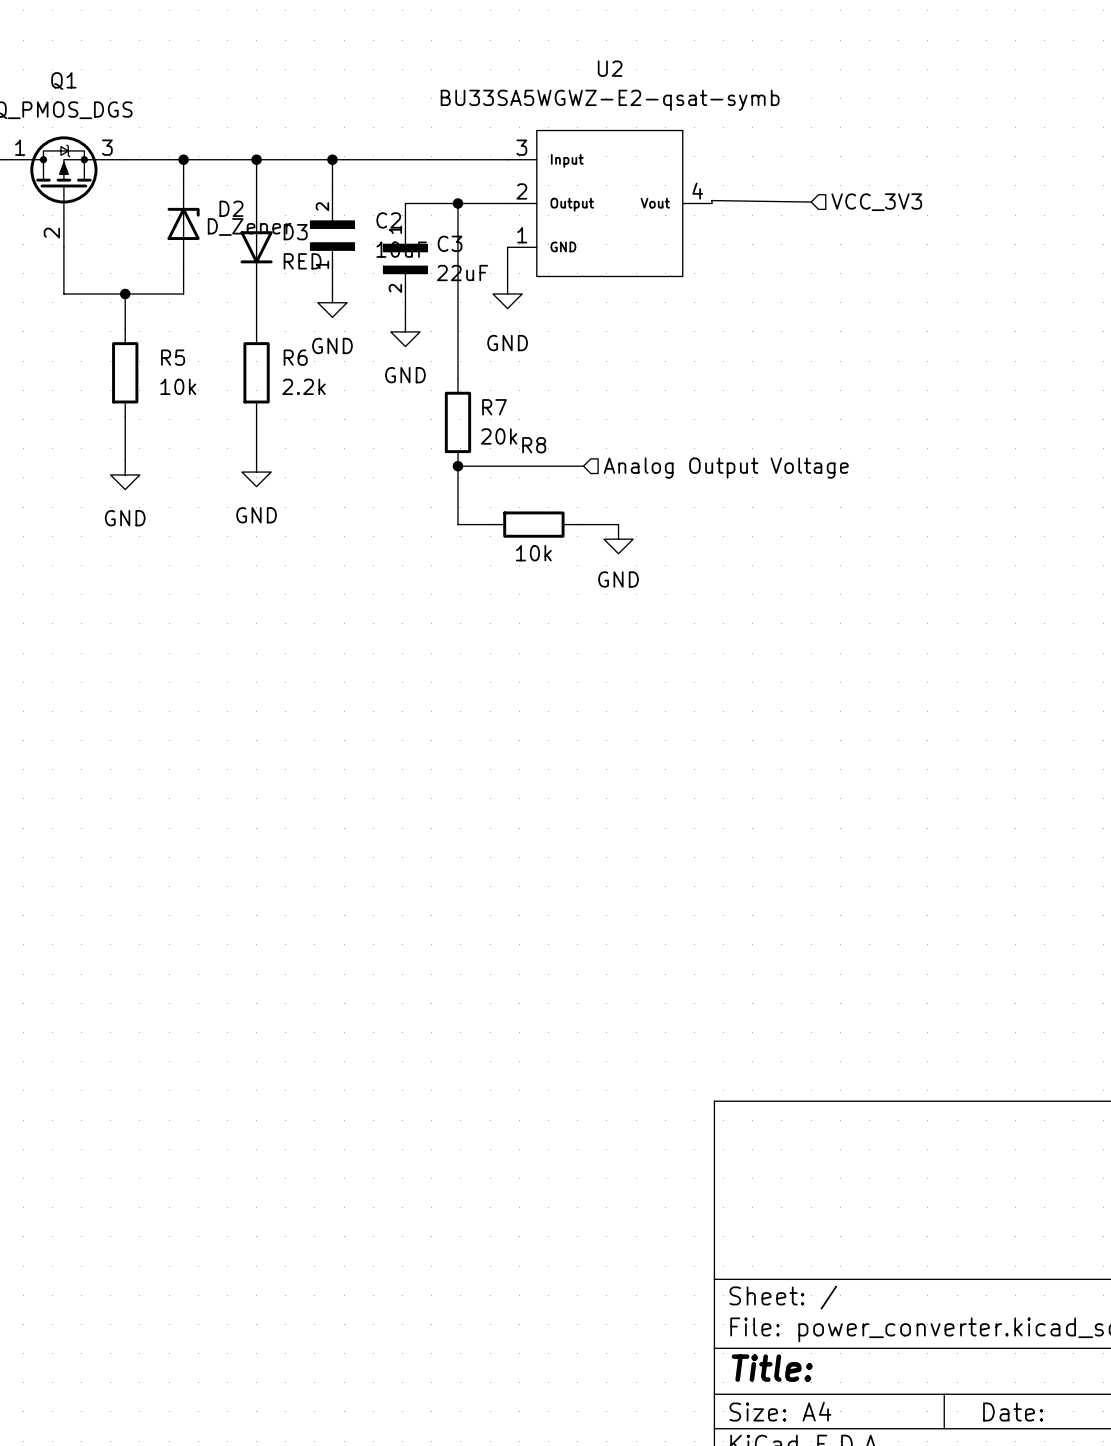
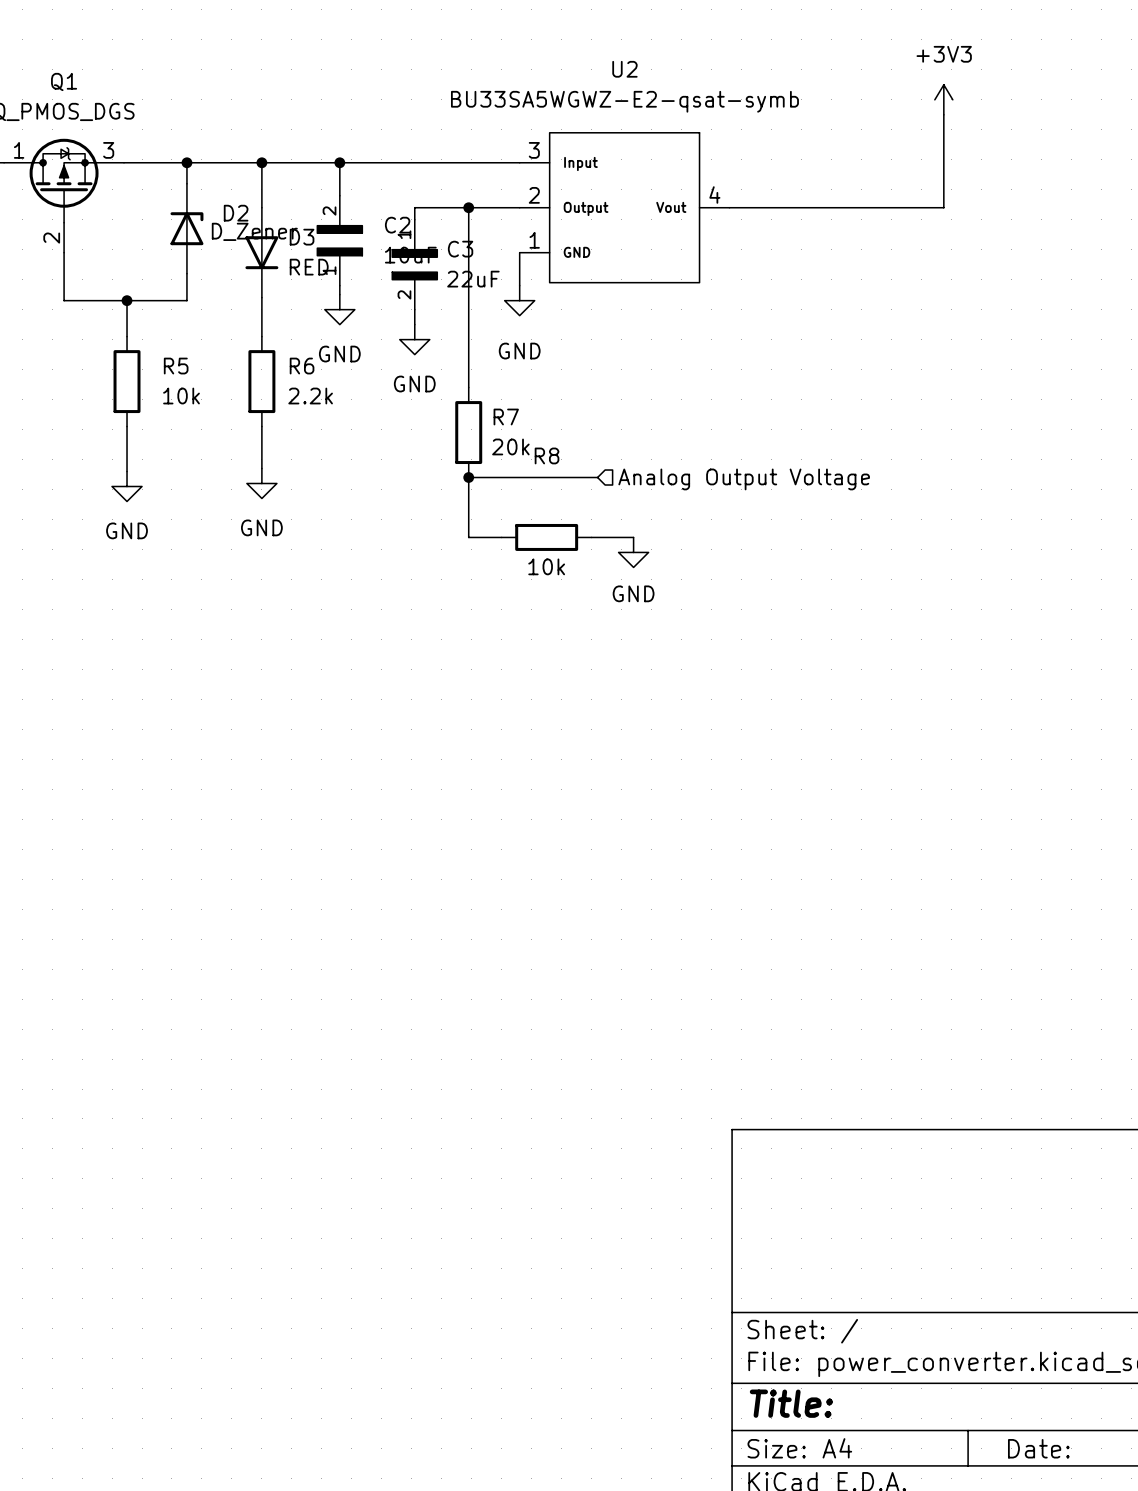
power symbol: none -> +3V3 (943, 99)
wire: (811, 202) (711, 200) (711, 203) -> (943, 114) (943, 207) (729, 207)
hierarchical label: VCC_3V3 (876, 202) -> none

